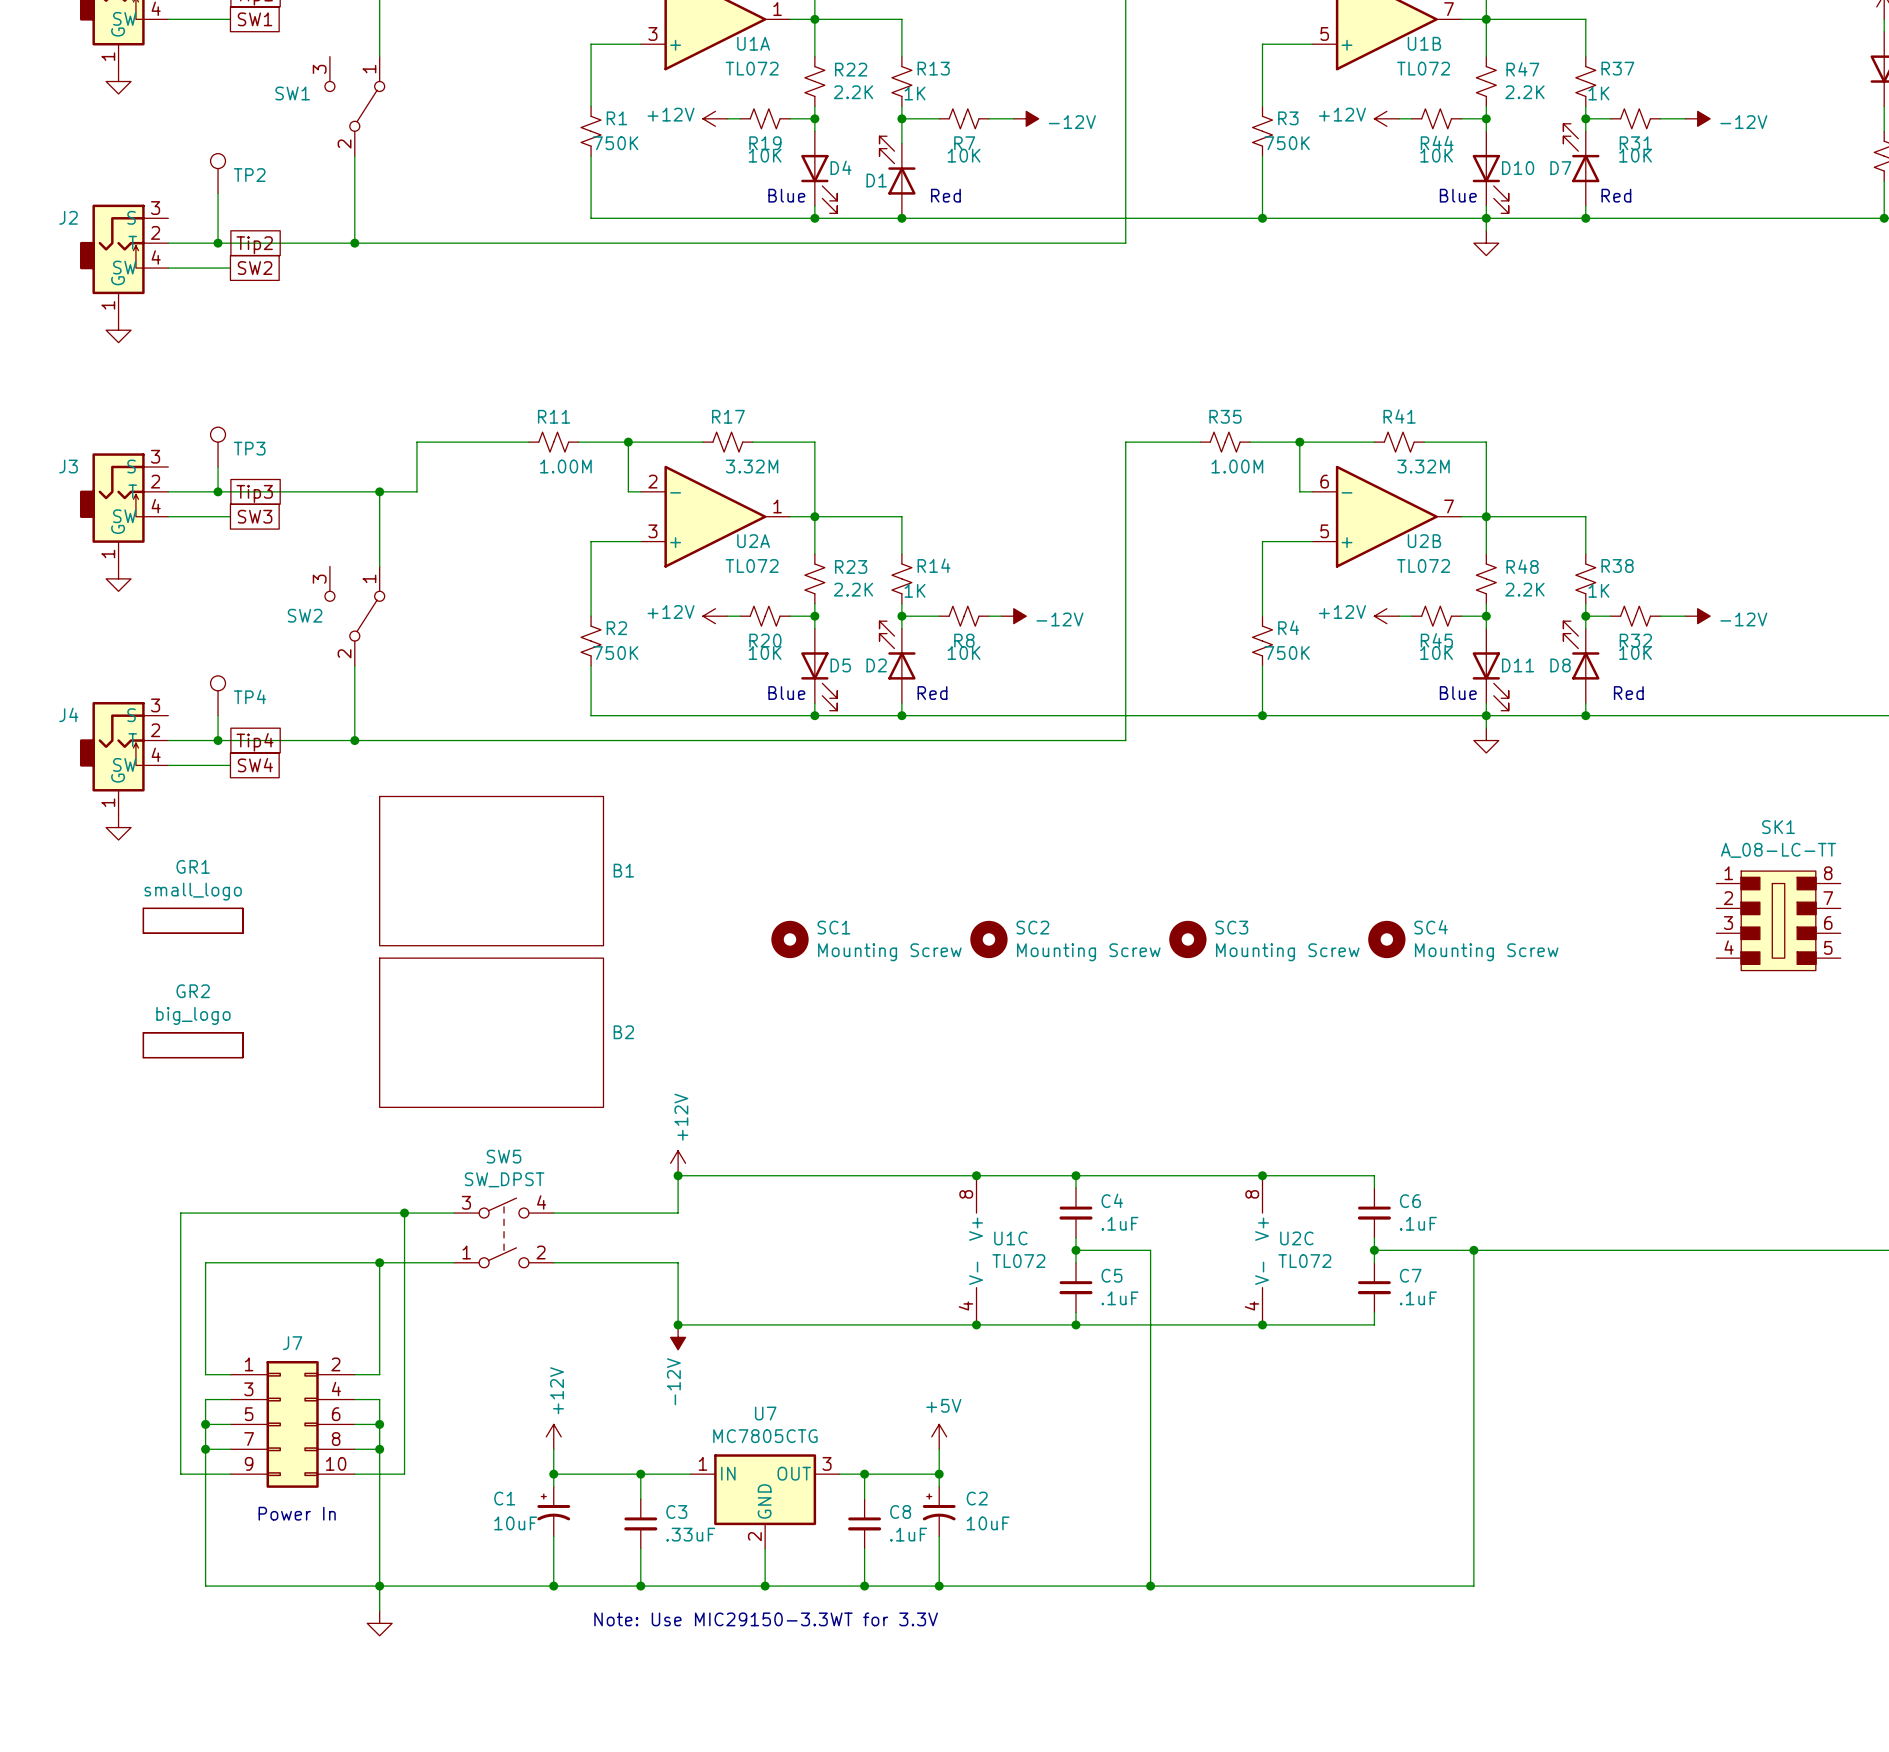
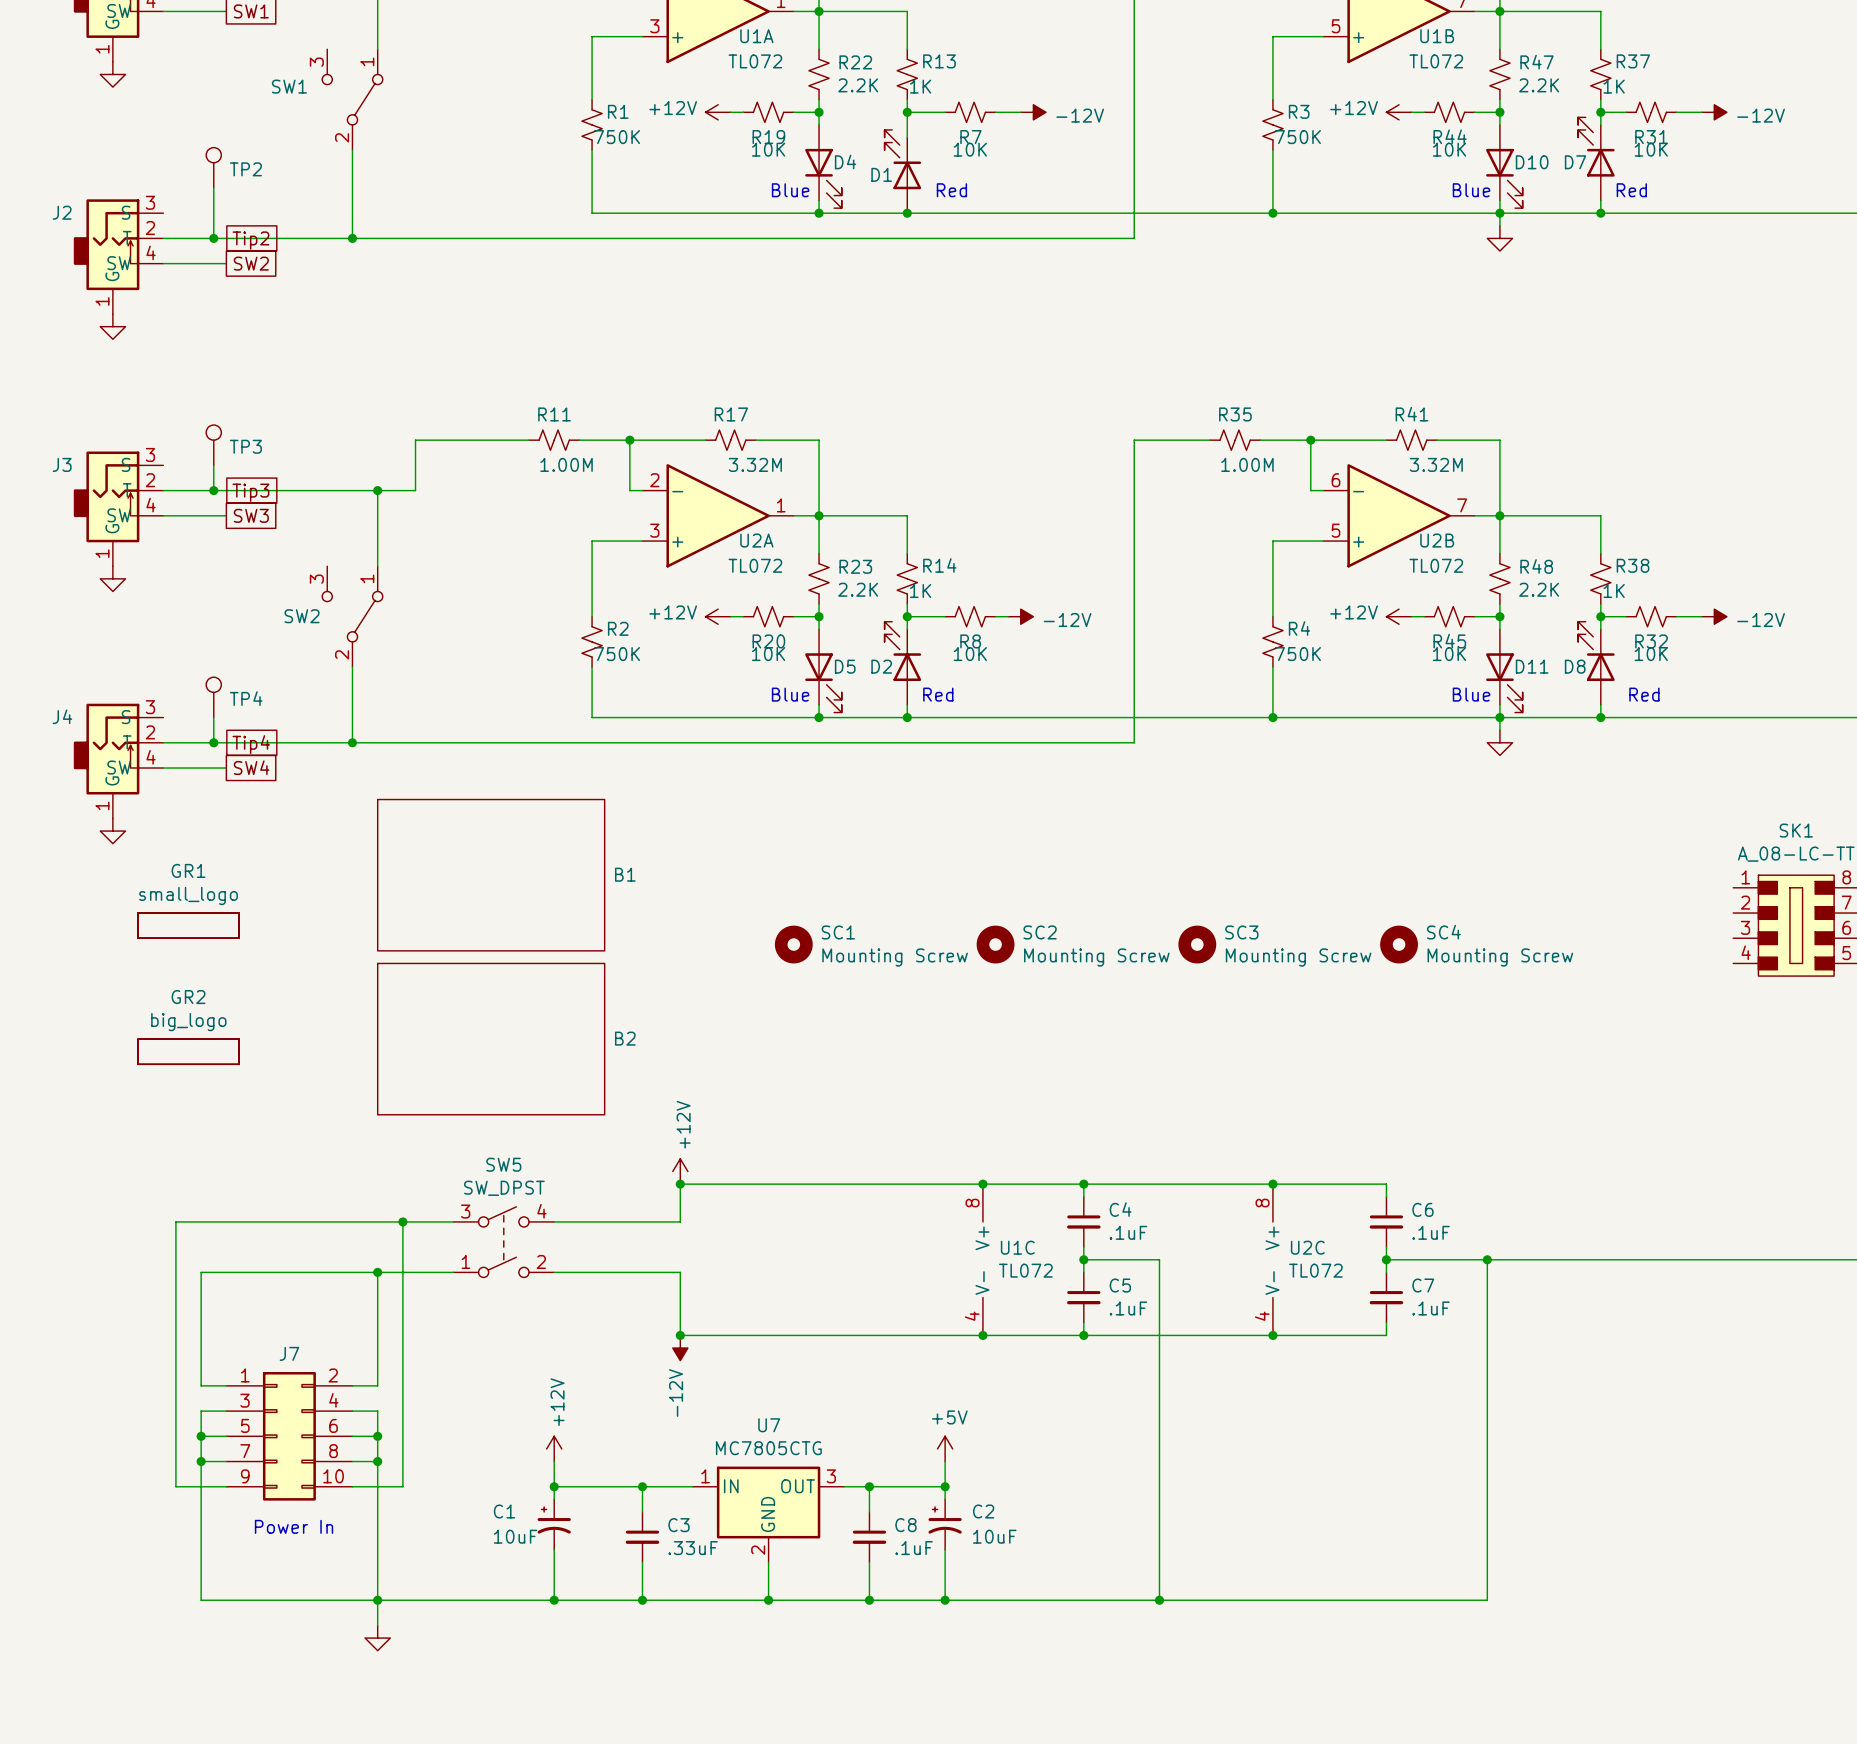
text: Note: Use MIC29150-3.3WT for 3.3V (766, 1619) -> none

